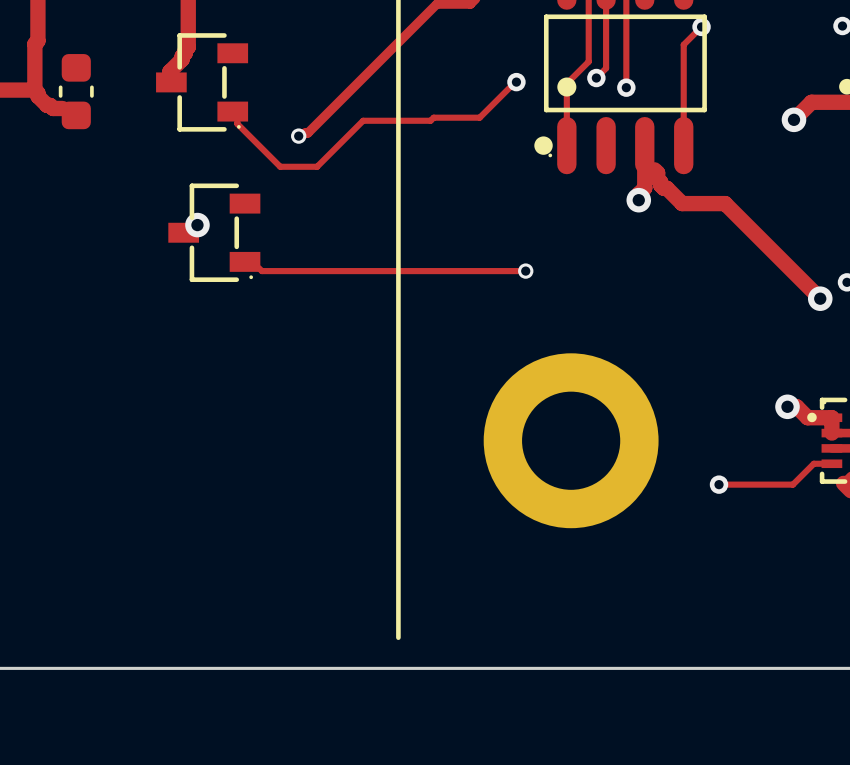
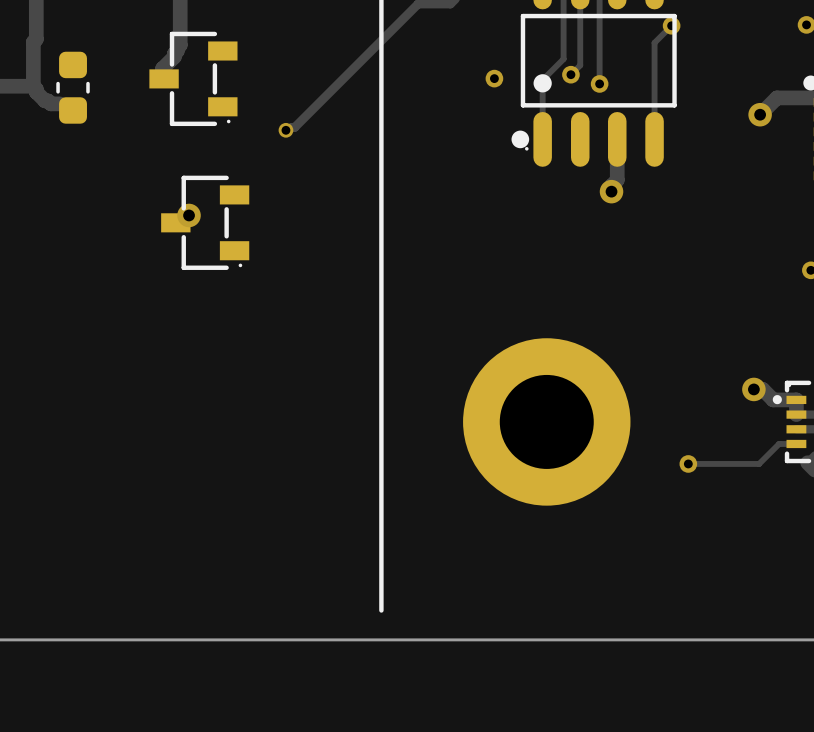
track: (516, 80) (479, 117) (433, 117) (430, 120) (363, 120) (317, 166) (280, 166) (237, 123) (237, 120) -> none
track: (654, 169) (657, 172) (660, 185) (666, 188) (682, 203) (725, 203) (820, 298) -> none
track: (258, 268) (261, 271) (525, 271) -> none
via: (525, 271) -> none
via: (820, 298) -> none

